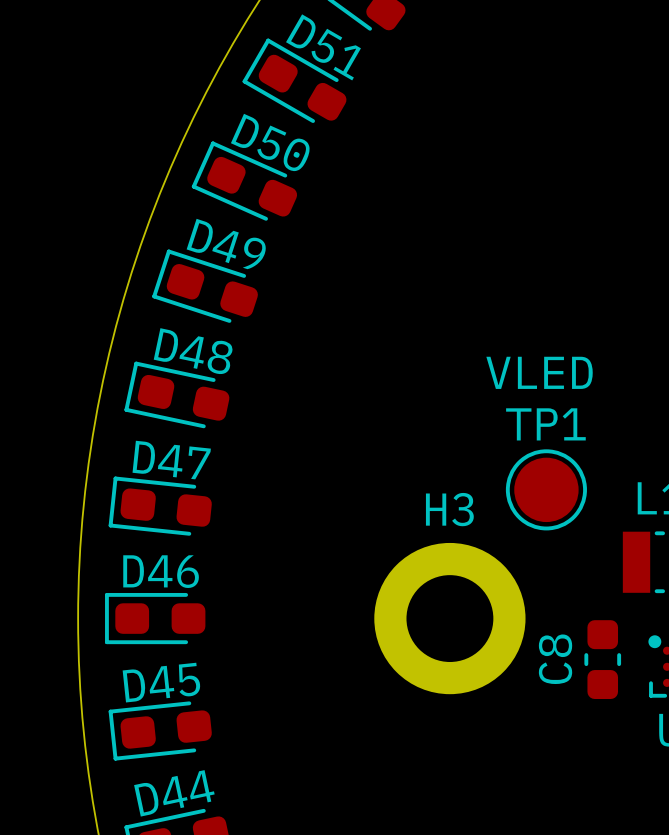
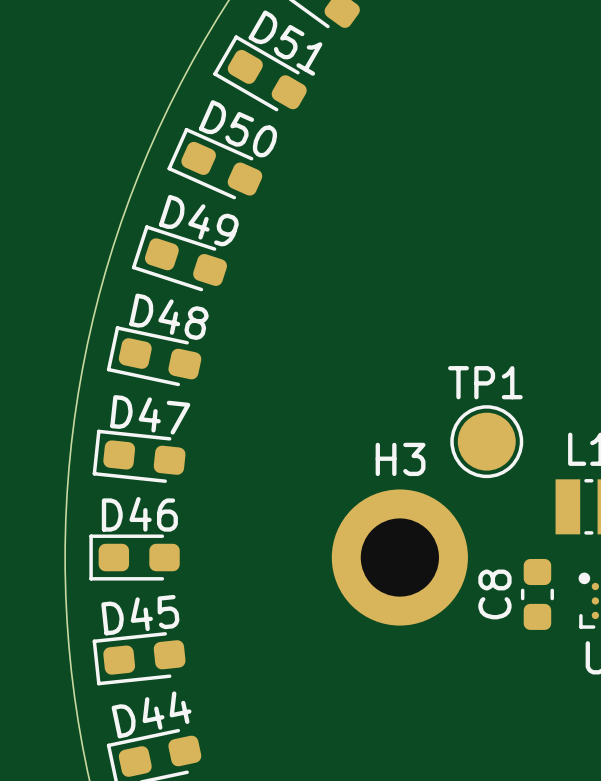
text: VLED (539, 372) -> none

